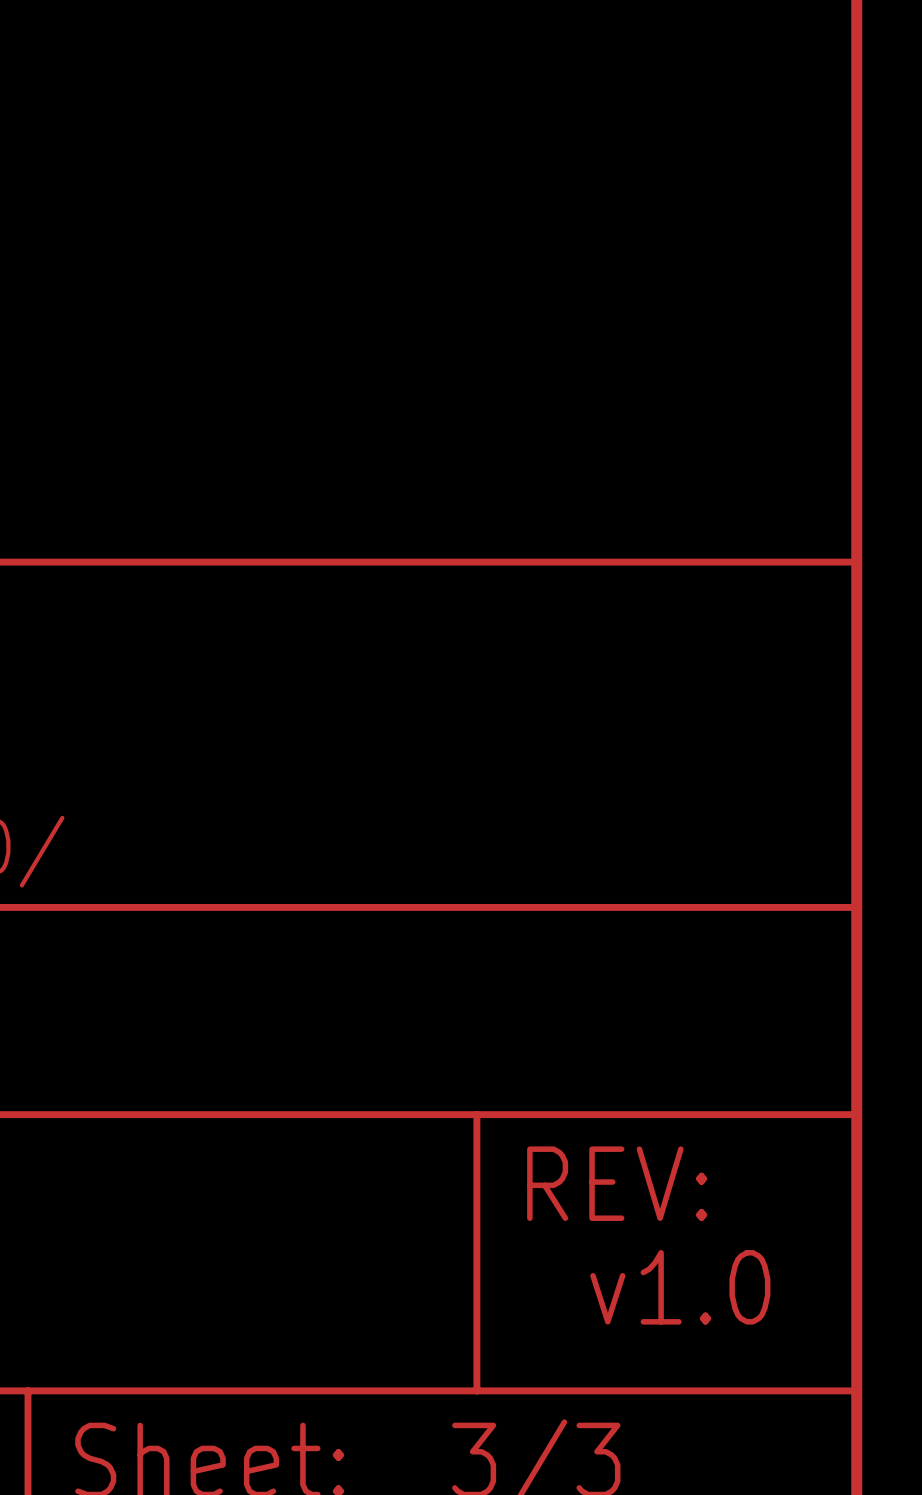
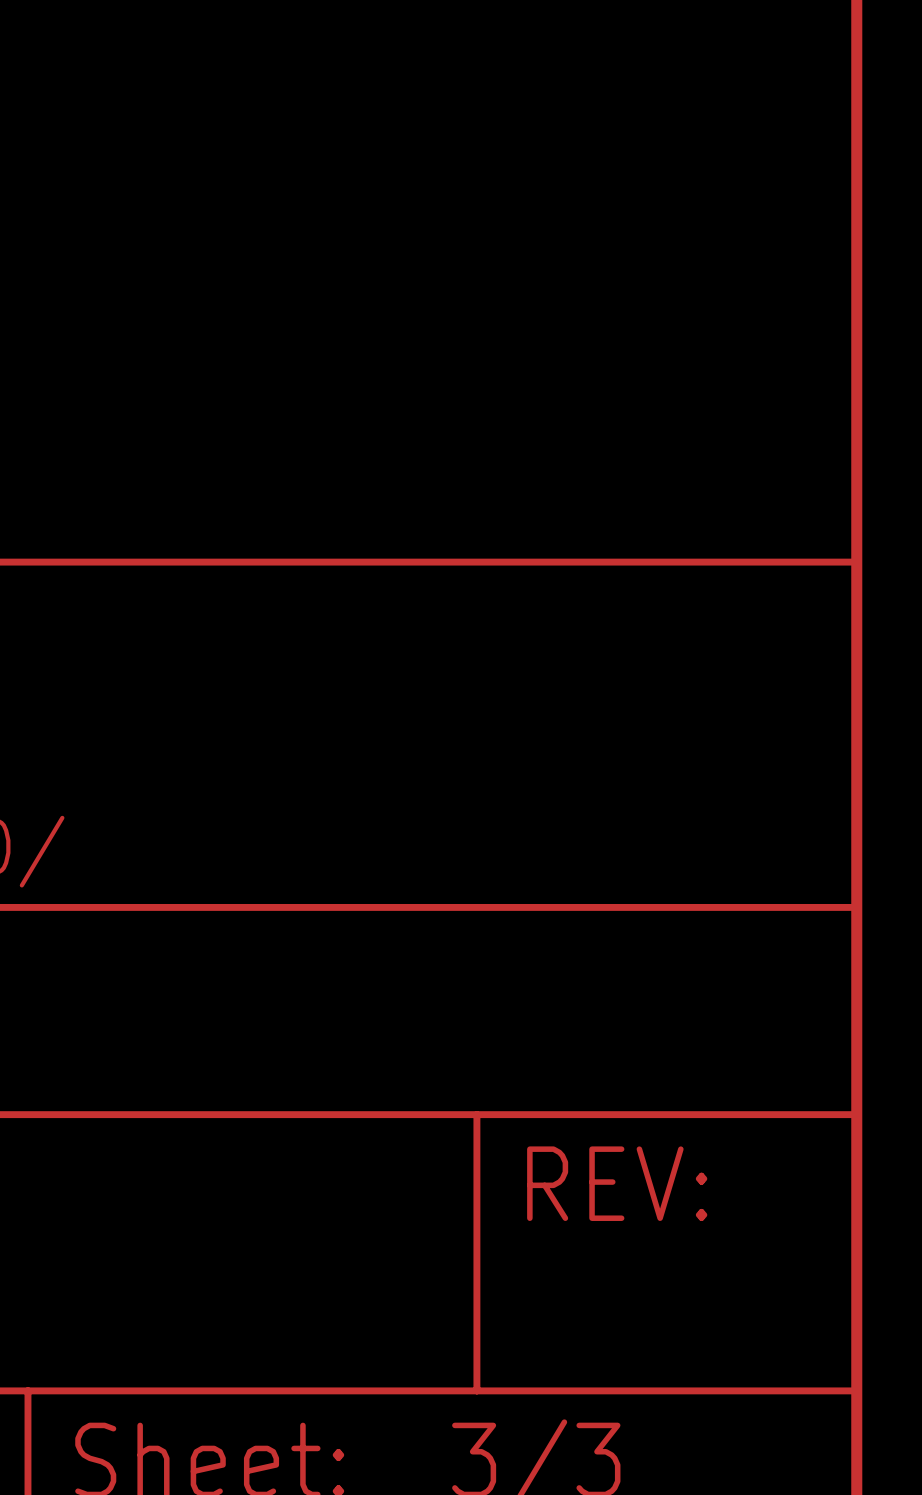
text: v1.0 (680, 1287) -> none

